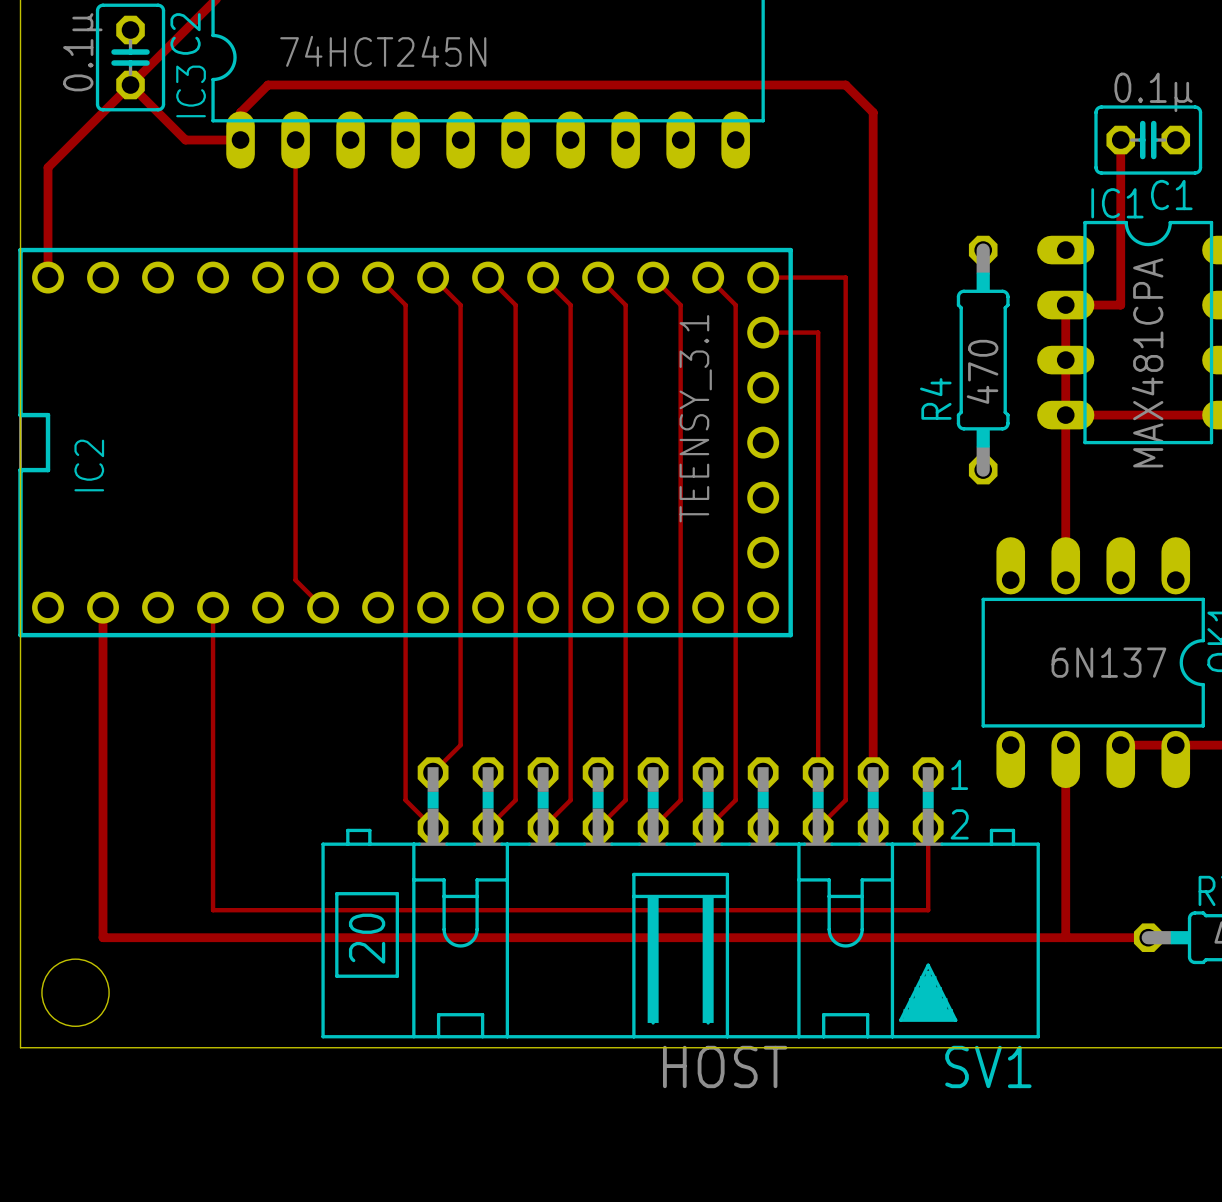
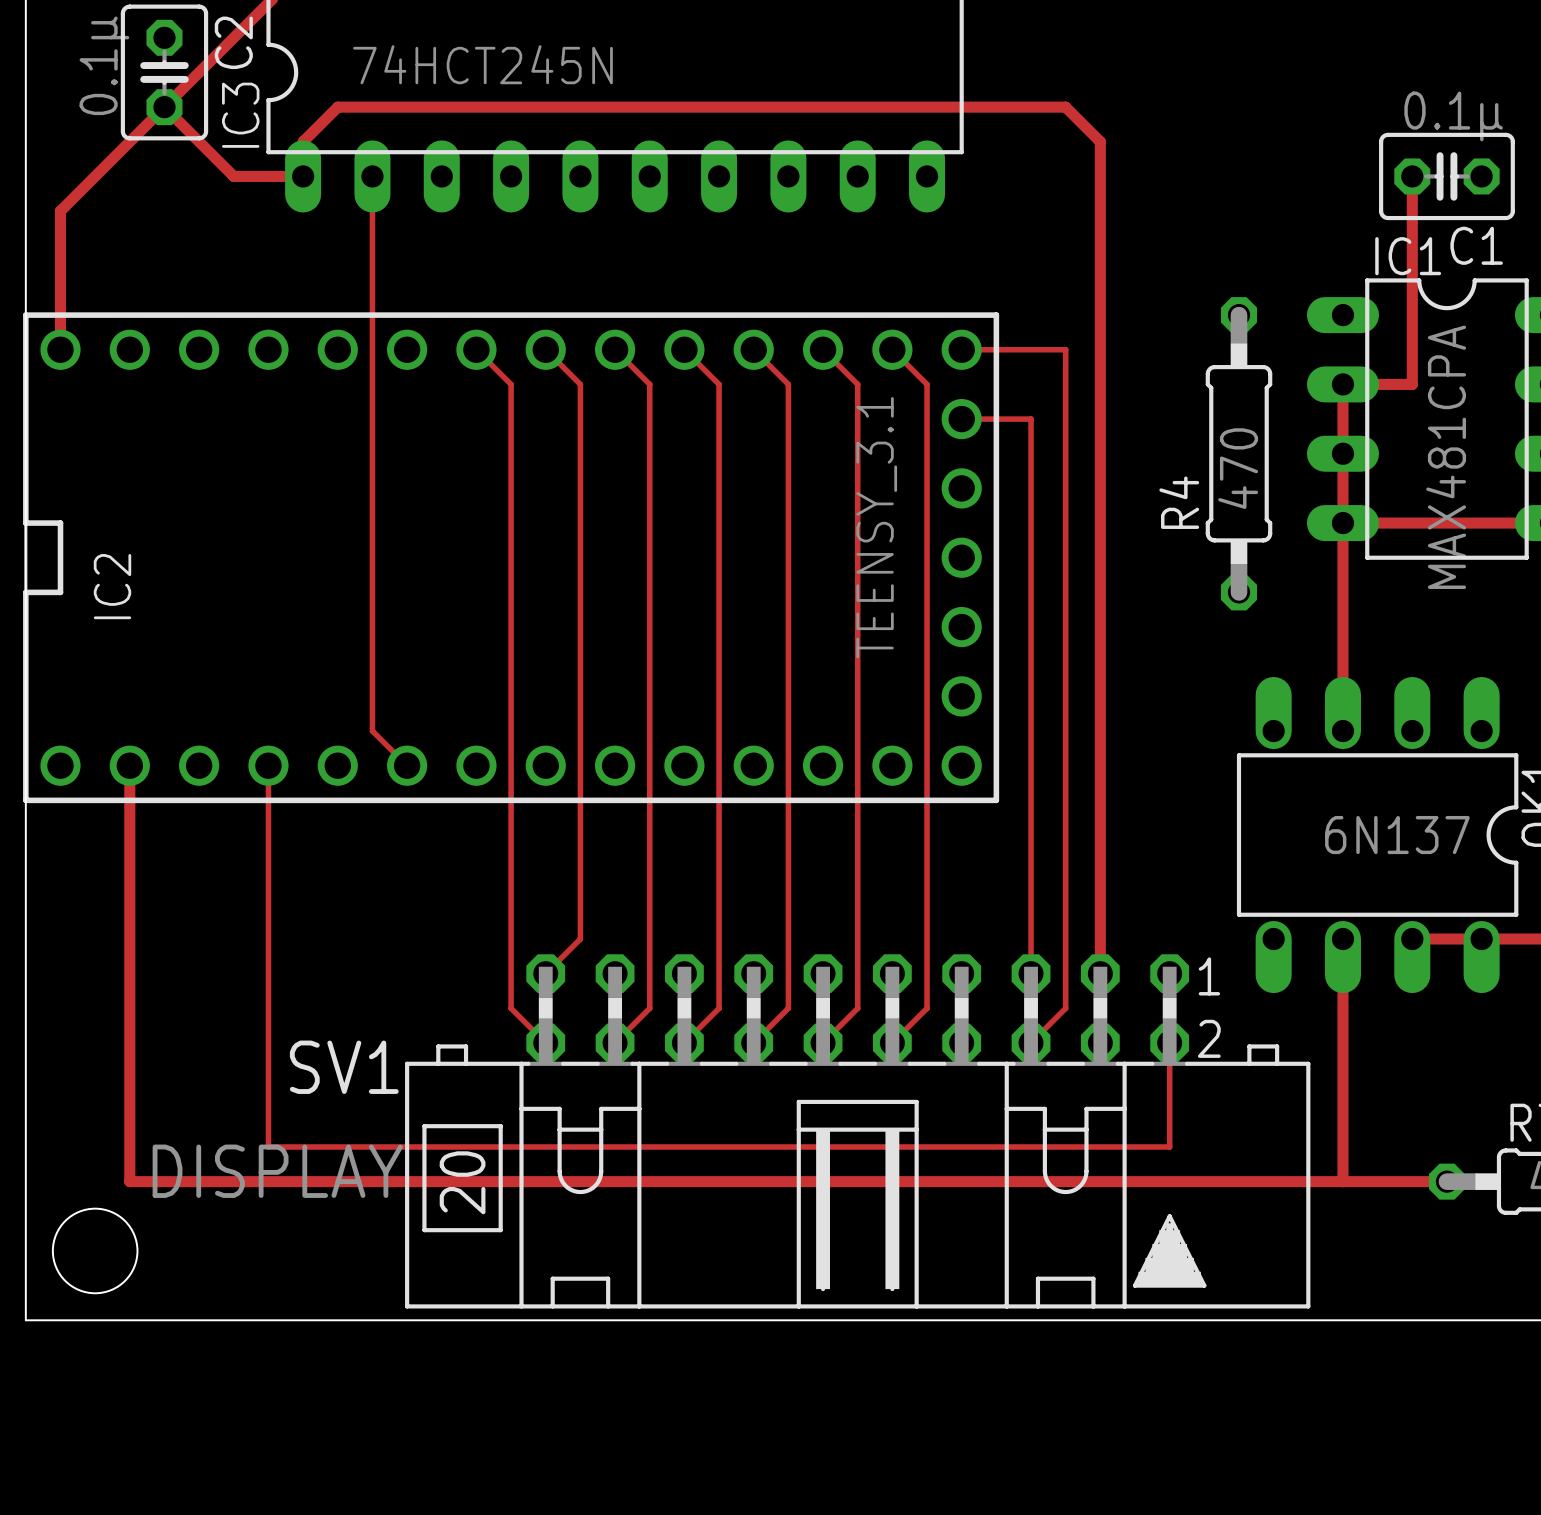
SV1 value: HOST (725, 1066) -> DISPLAY (277, 1171)
SV1 name position: SV1 (988, 1066) -> SV1 (344, 1067)

